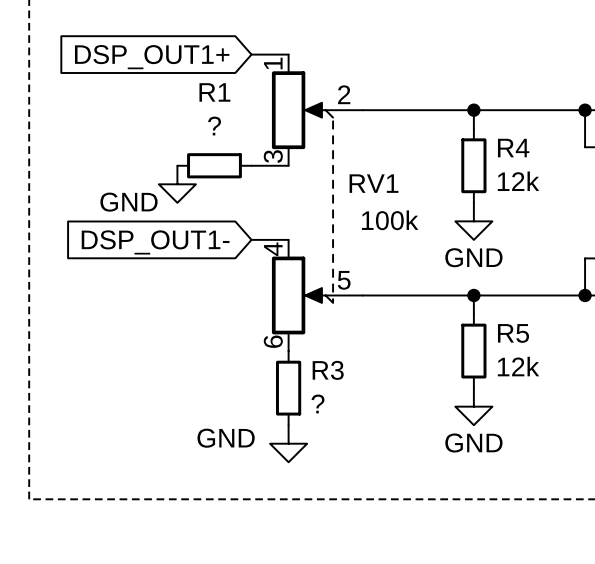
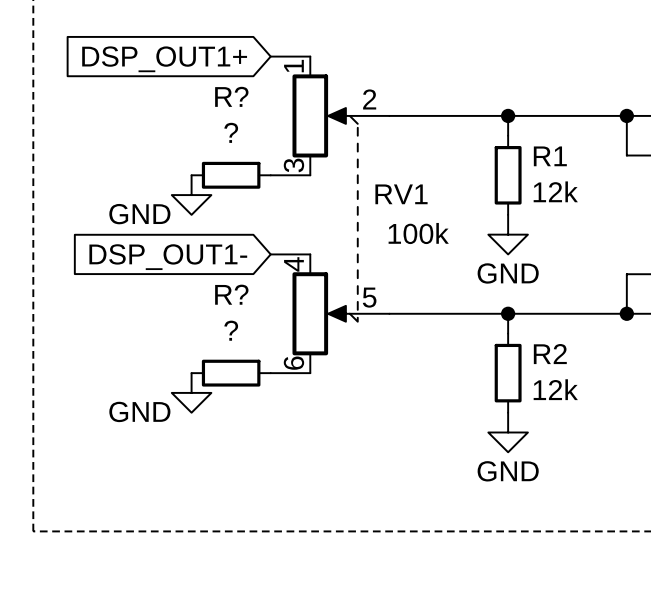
R1 name: R1 (214, 92) -> R? (231, 96)
R4 name: R4 (513, 148) -> R1 (550, 156)
R5 name: R5 (513, 333) -> R2 (550, 354)
R?: none -> ? (231, 373)
wire: none -> (270, 373) (310, 373)
R3: ? (288, 388) -> none
power symbol text position: GND (226, 438) -> GND (139, 411)
power symbol position: GND (288, 443) -> GND (191, 392)

